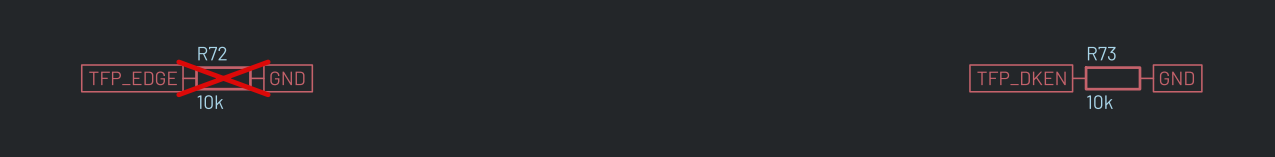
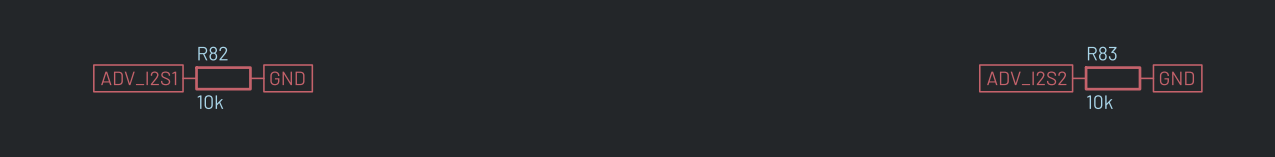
R72 name: R72 (212, 53) -> R82 (212, 53)
R73 name: R73 (1101, 53) -> R83 (1102, 53)
global label: TFP_EDGE (133, 78) -> ADV_I2S1 (138, 78)
R72 do-not-place cross: (223, 78) -> none
global label: TFP_DKEN (1021, 78) -> ADV_I2S2 (1026, 78)

